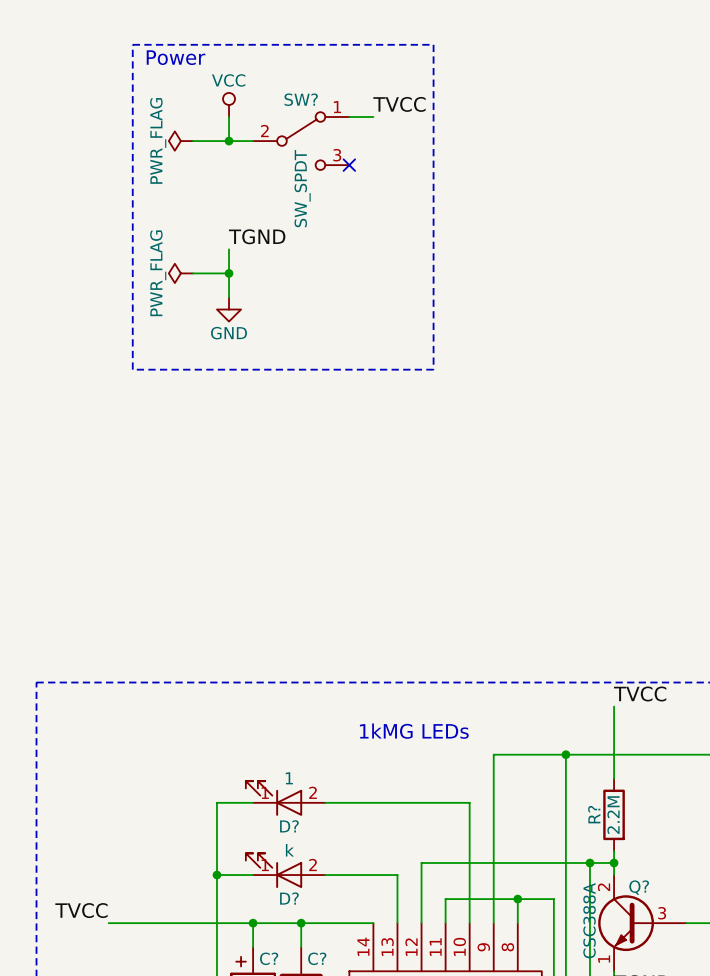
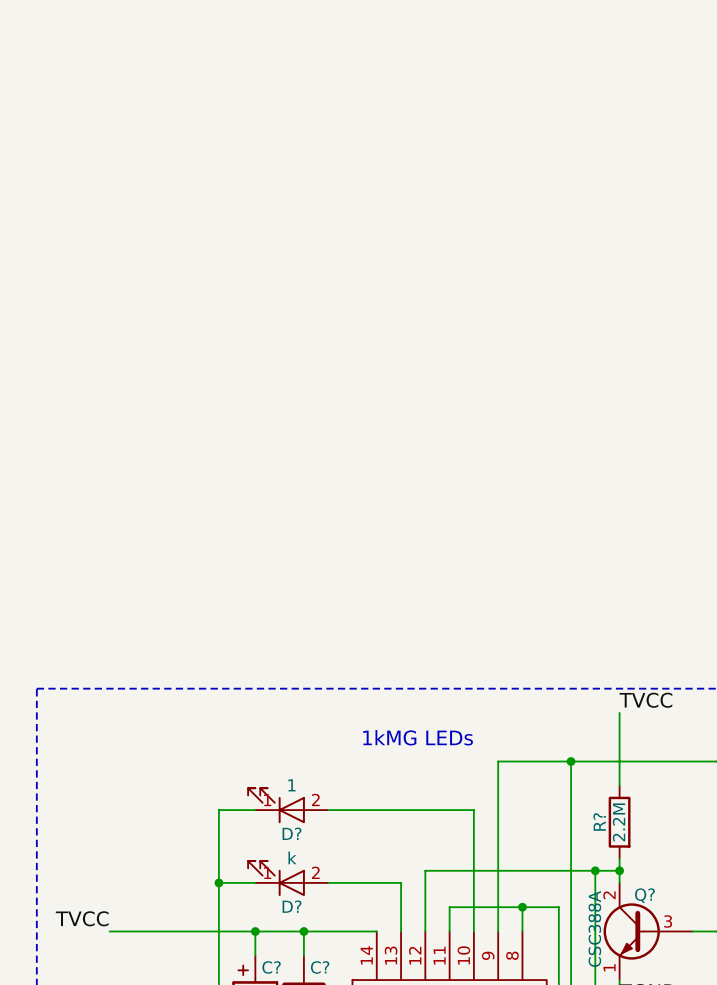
line: (132, 44) (433, 44) (433, 369) (132, 369) (132, 44) -> none
text: Power (176, 57) -> none
power symbol: VCC (229, 104) -> none
label: TVCC (399, 104) -> none
wire: (229, 117) (229, 141) -> none
wire: (349, 117) (373, 117) -> none
power symbol: PWR_FLAG (180, 141) -> none
wire: (192, 141) (253, 141) -> none
junction: (229, 141) -> none
SW?: SW_SPDT (301, 141) -> none
no-connect mark: (349, 165) -> none
label: TGND (257, 236) -> none
wire: (229, 249) (229, 297) -> none
power symbol: PWR_FLAG (180, 273) -> none
wire: (192, 273) (229, 273) -> none
junction: (229, 273) -> none
power symbol: GND (229, 309) -> none

